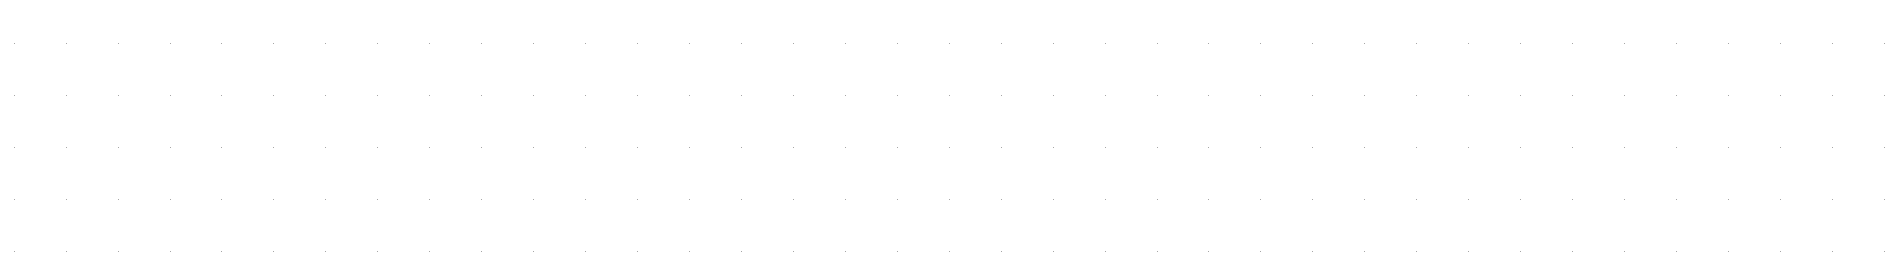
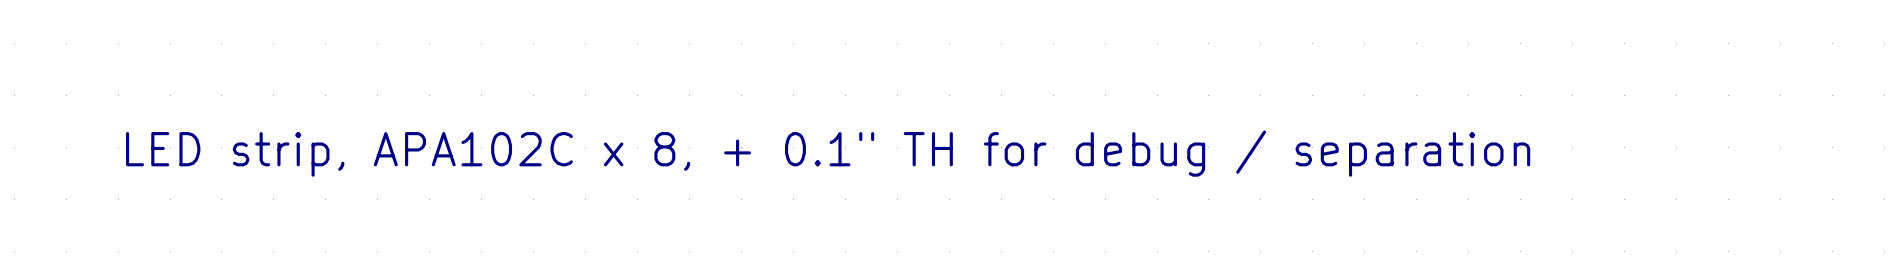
text: none -> LED strip, APA102C x 8, + 0.1" TH for debug / separation (828, 153)

